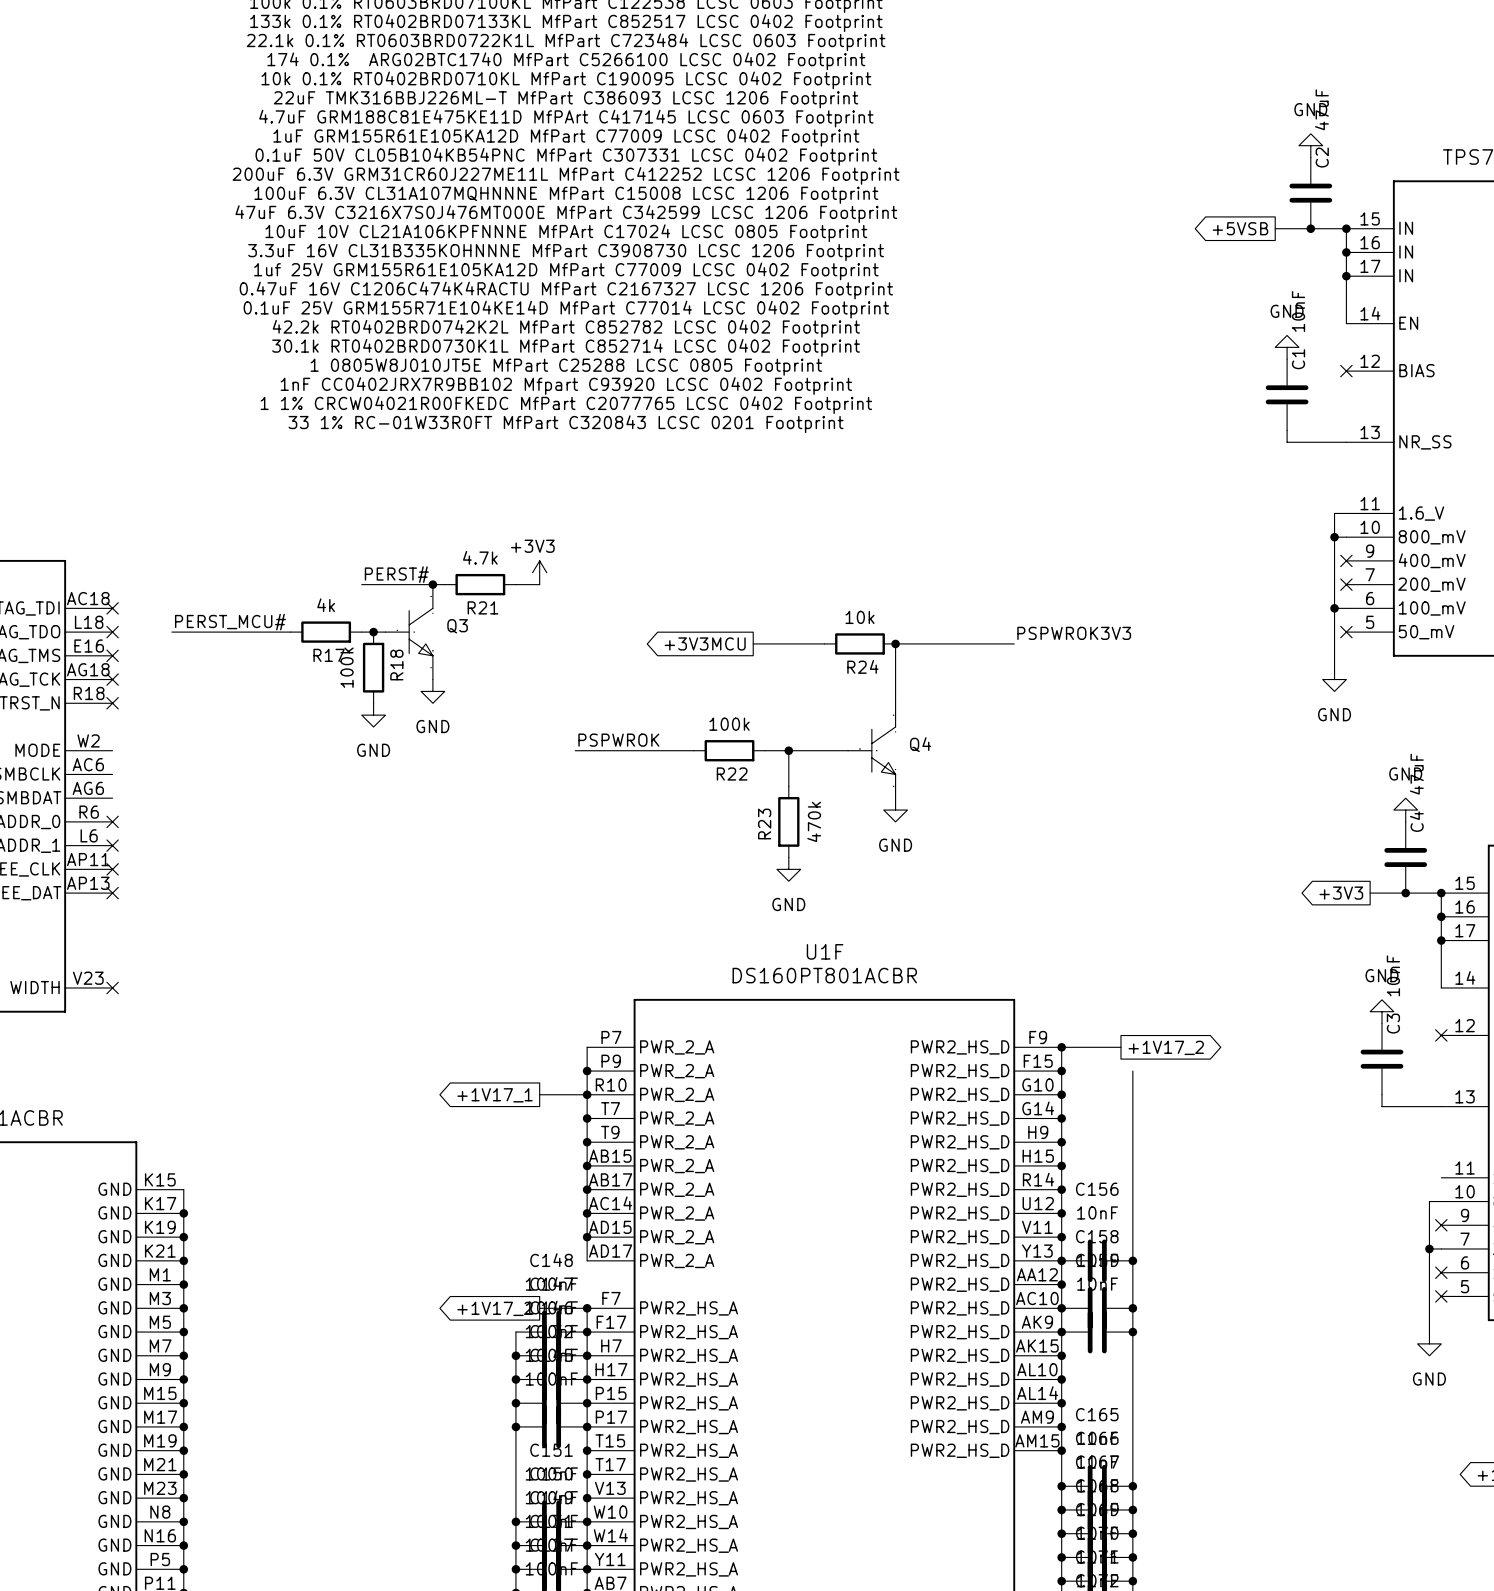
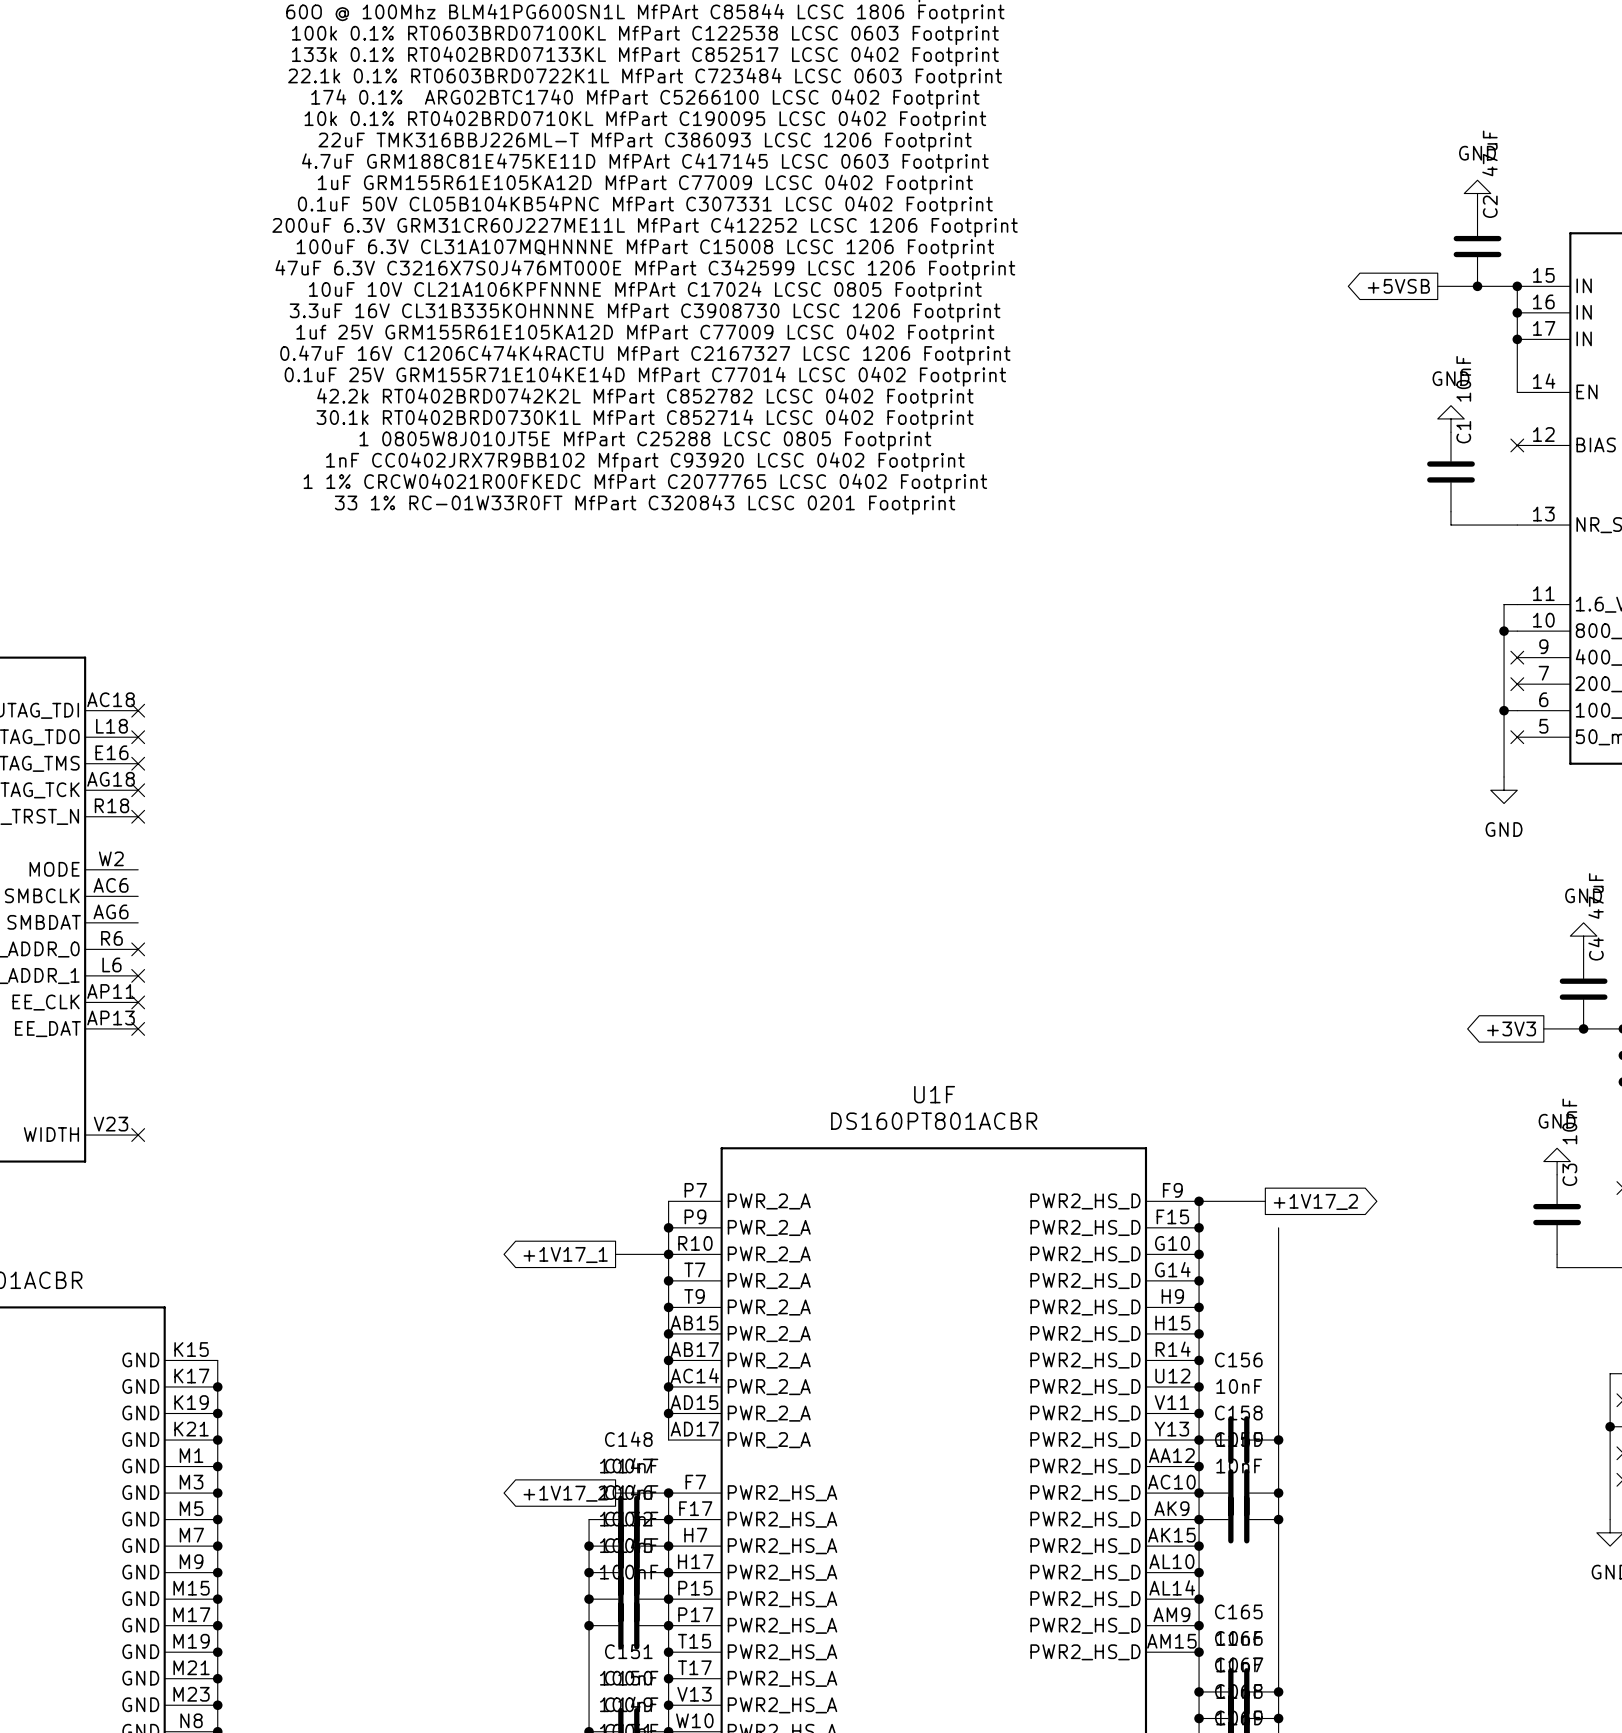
power symbol: +3V3 (539, 572) -> none
label: PERST# (396, 574) -> none
wire: (361, 584) (444, 584) -> none
junction: (432, 584) -> none
R21: 4.7k (480, 584) -> none
wire: (515, 584) (539, 584) -> none
label: PERST_MCU# (230, 622) -> none
wire: (171, 632) (290, 632) -> none
R17: 4k (326, 632) -> none
wire: (361, 632) (385, 632) -> none
junction: (373, 632) -> none
Q3: (409, 632) -> none
label: PSPWROK3V3 (1074, 633) -> none
global label: +3V3MCU (705, 643) -> none
wire: (753, 643) (824, 643) -> none
R24: 10k (859, 643) -> none
junction: (895, 643) -> none
wire: (1014, 643) (895, 643) (895, 703) -> none
R18: 100k (373, 667) -> none
power symbol: GND (432, 691) -> none
power symbol: GND (373, 715) -> none
label: PSPWROK (618, 740) -> none
wire: (575, 750) (693, 750) -> none
R22: 100k (729, 750) -> none
wire: (765, 750) (848, 750) -> none
wire: (788, 750) (788, 786) -> none
junction: (788, 750) -> none
Q4: (871, 750) -> none
power symbol: GND (895, 810) -> none
R23: 470k (788, 821) -> none
power symbol: GND (788, 869) -> none

